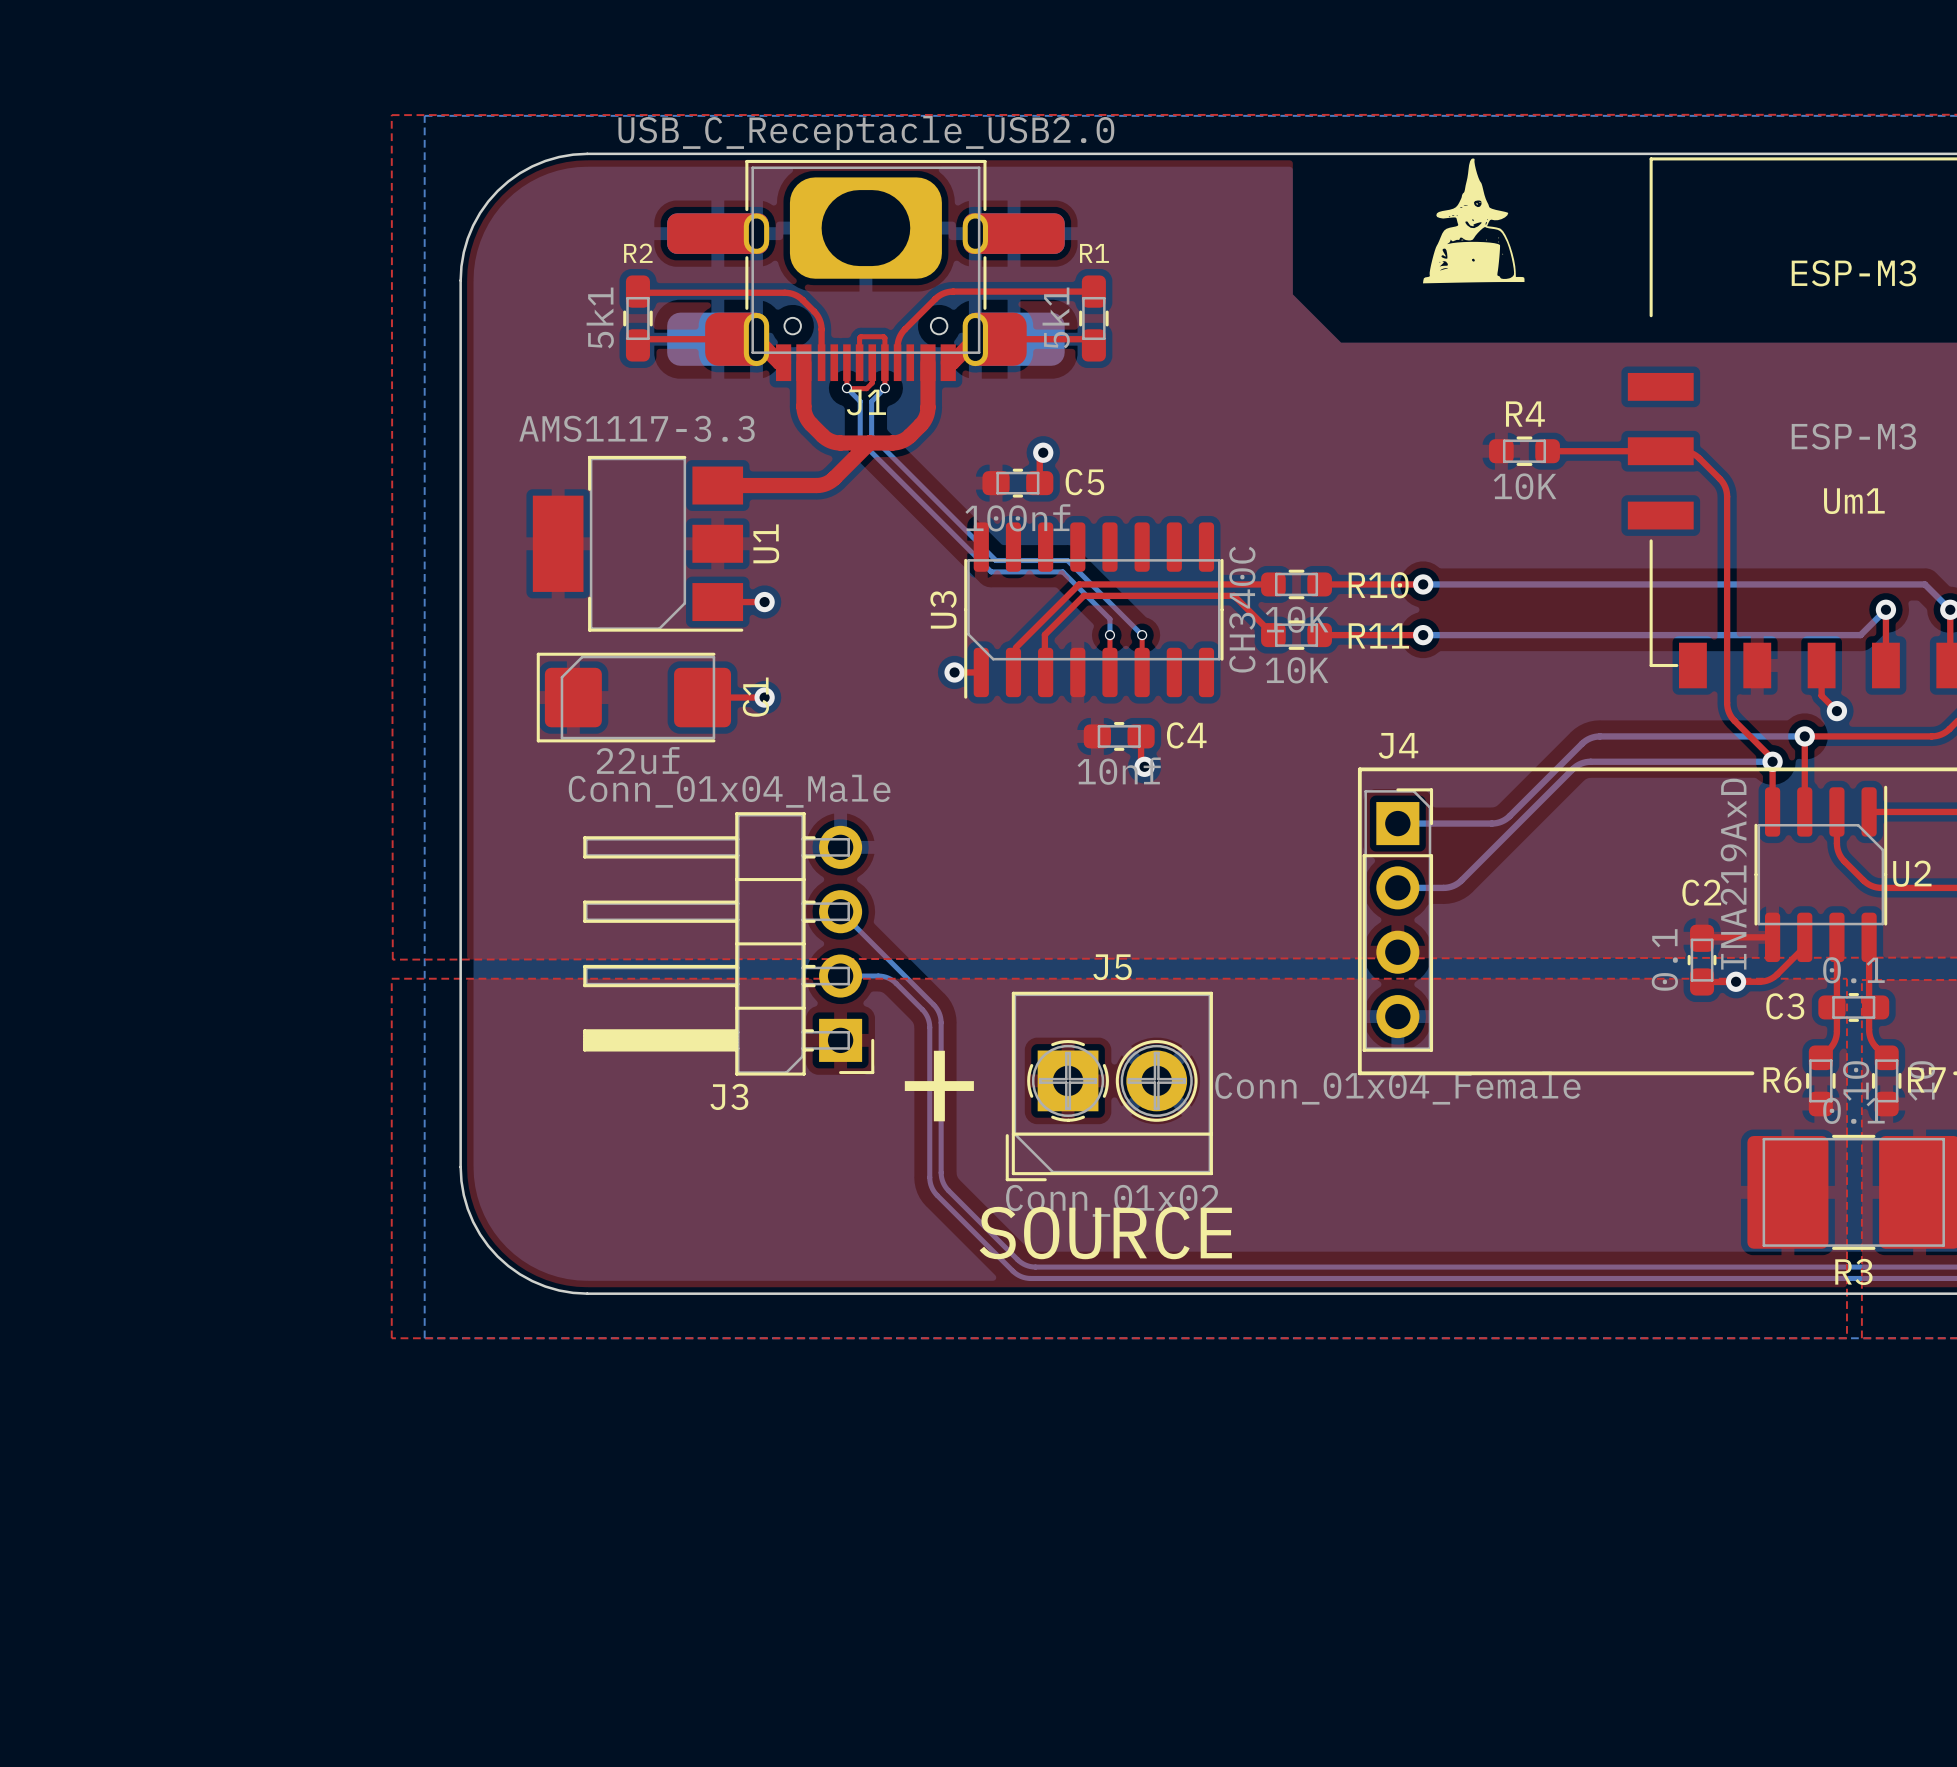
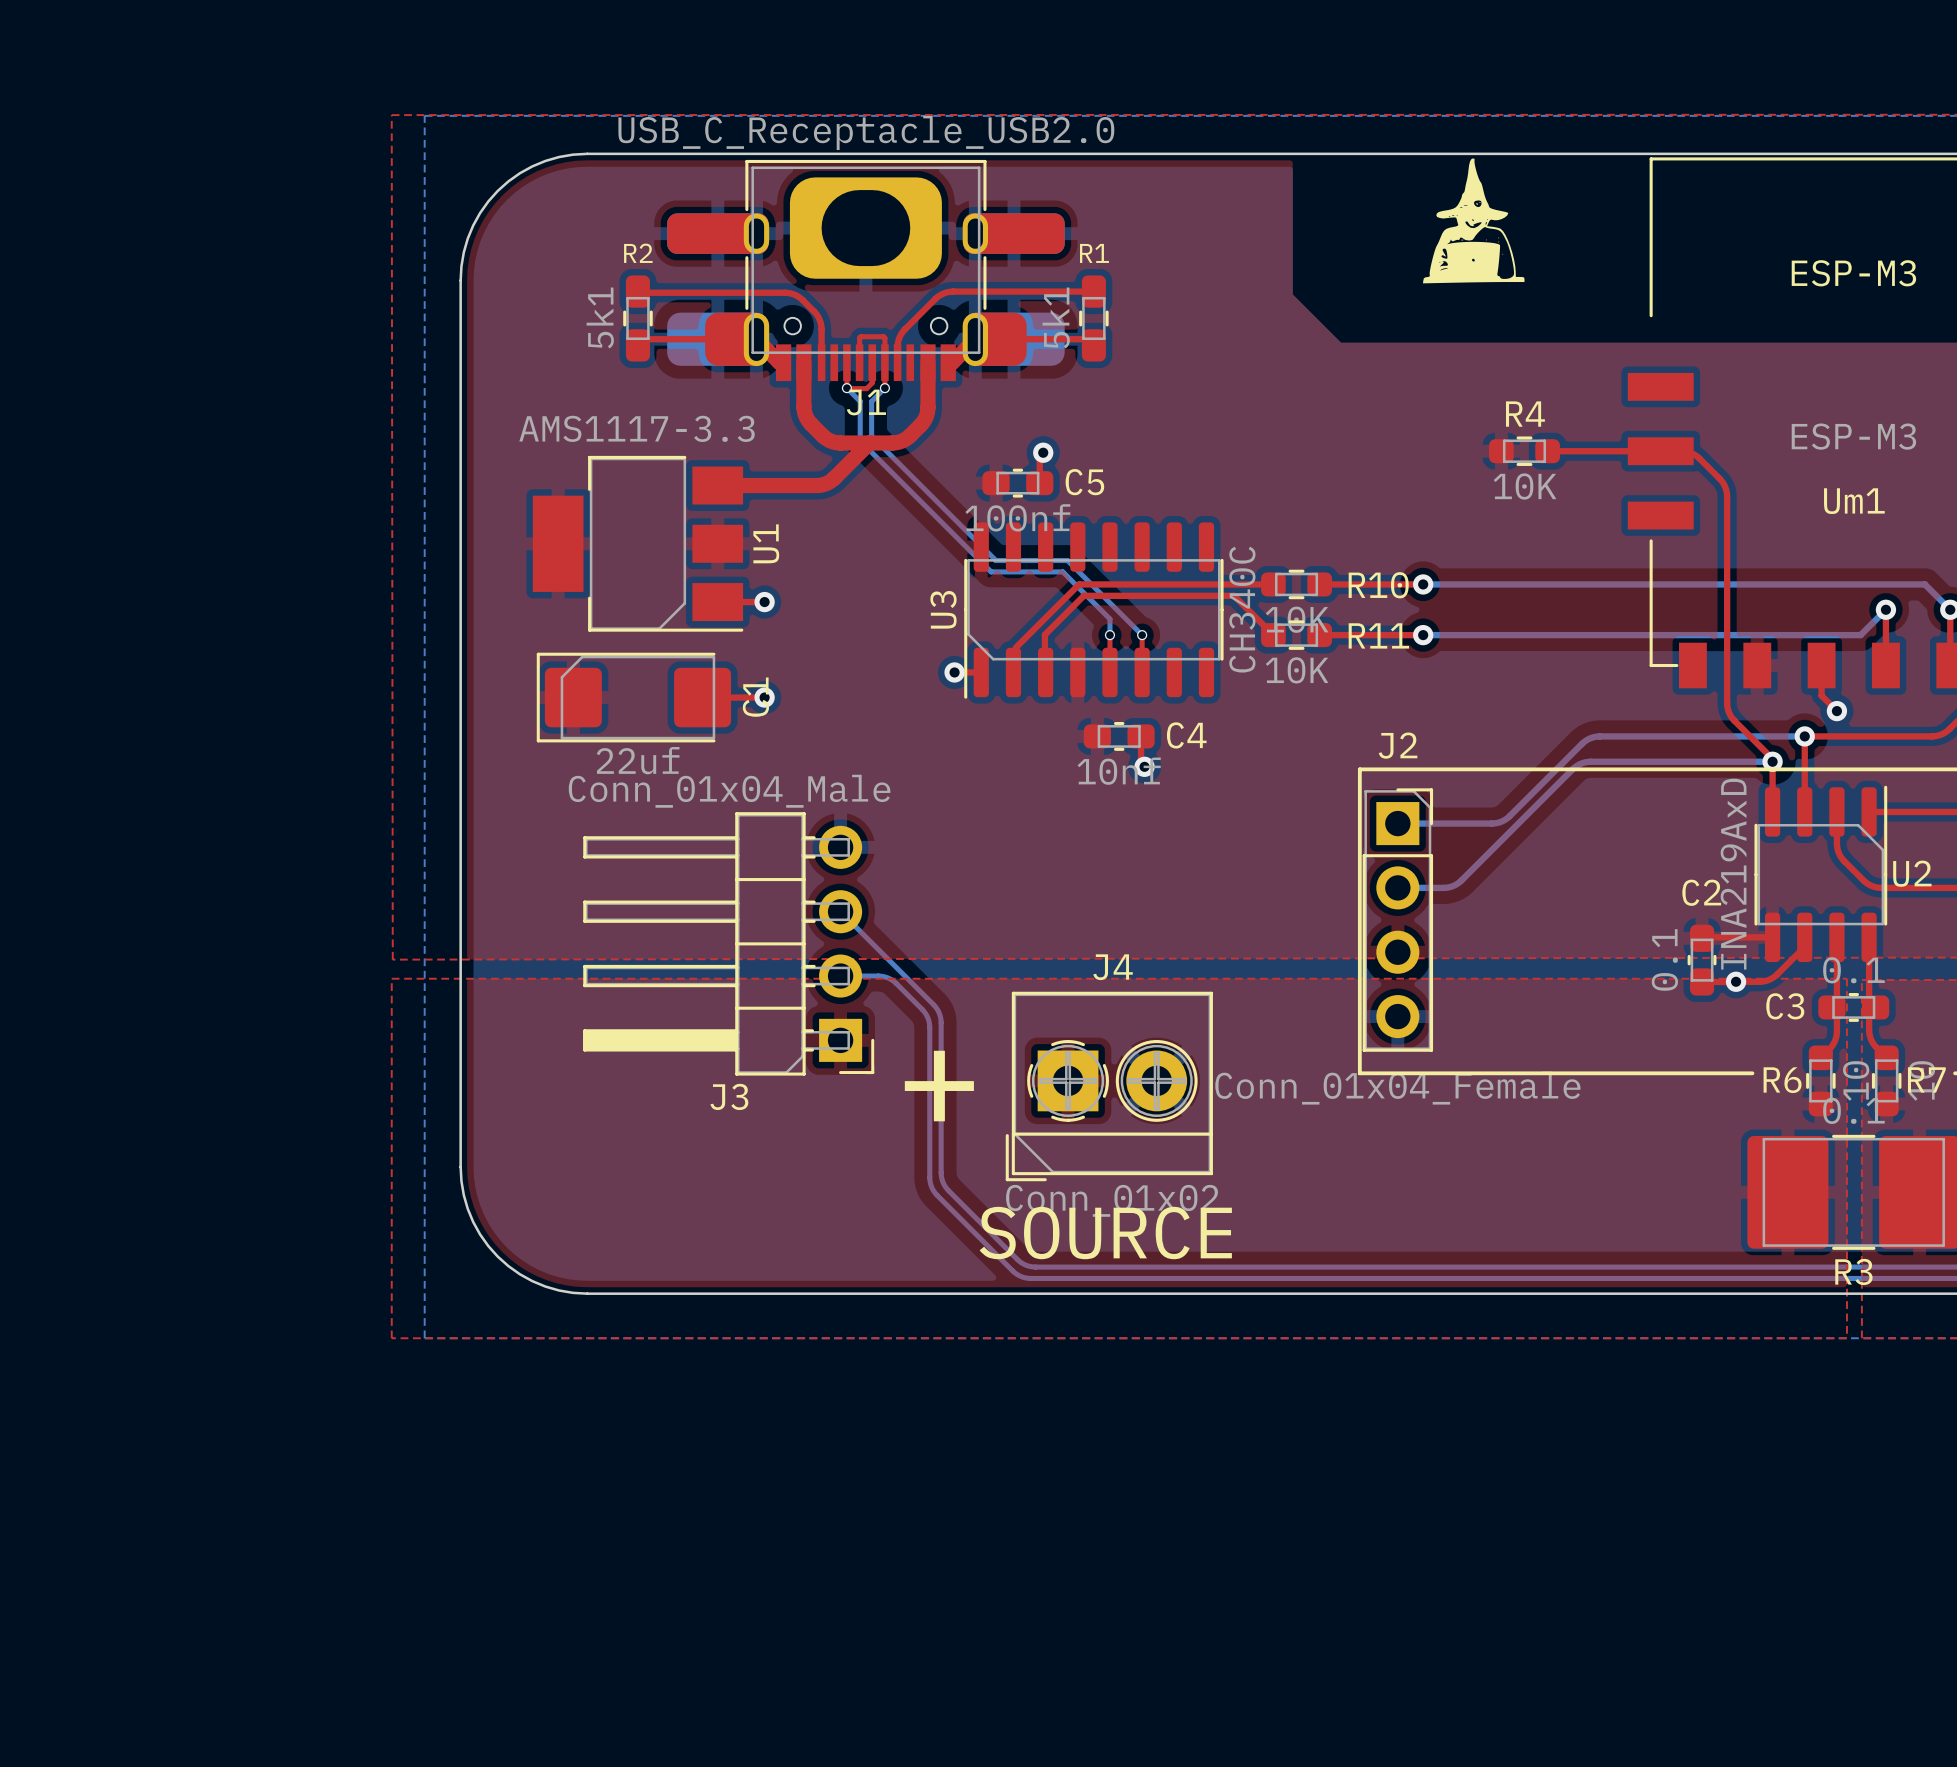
J4 name: J4 (1398, 745) -> J2 (1398, 745)
J5 name: J5 (1112, 967) -> J4 (1113, 967)

